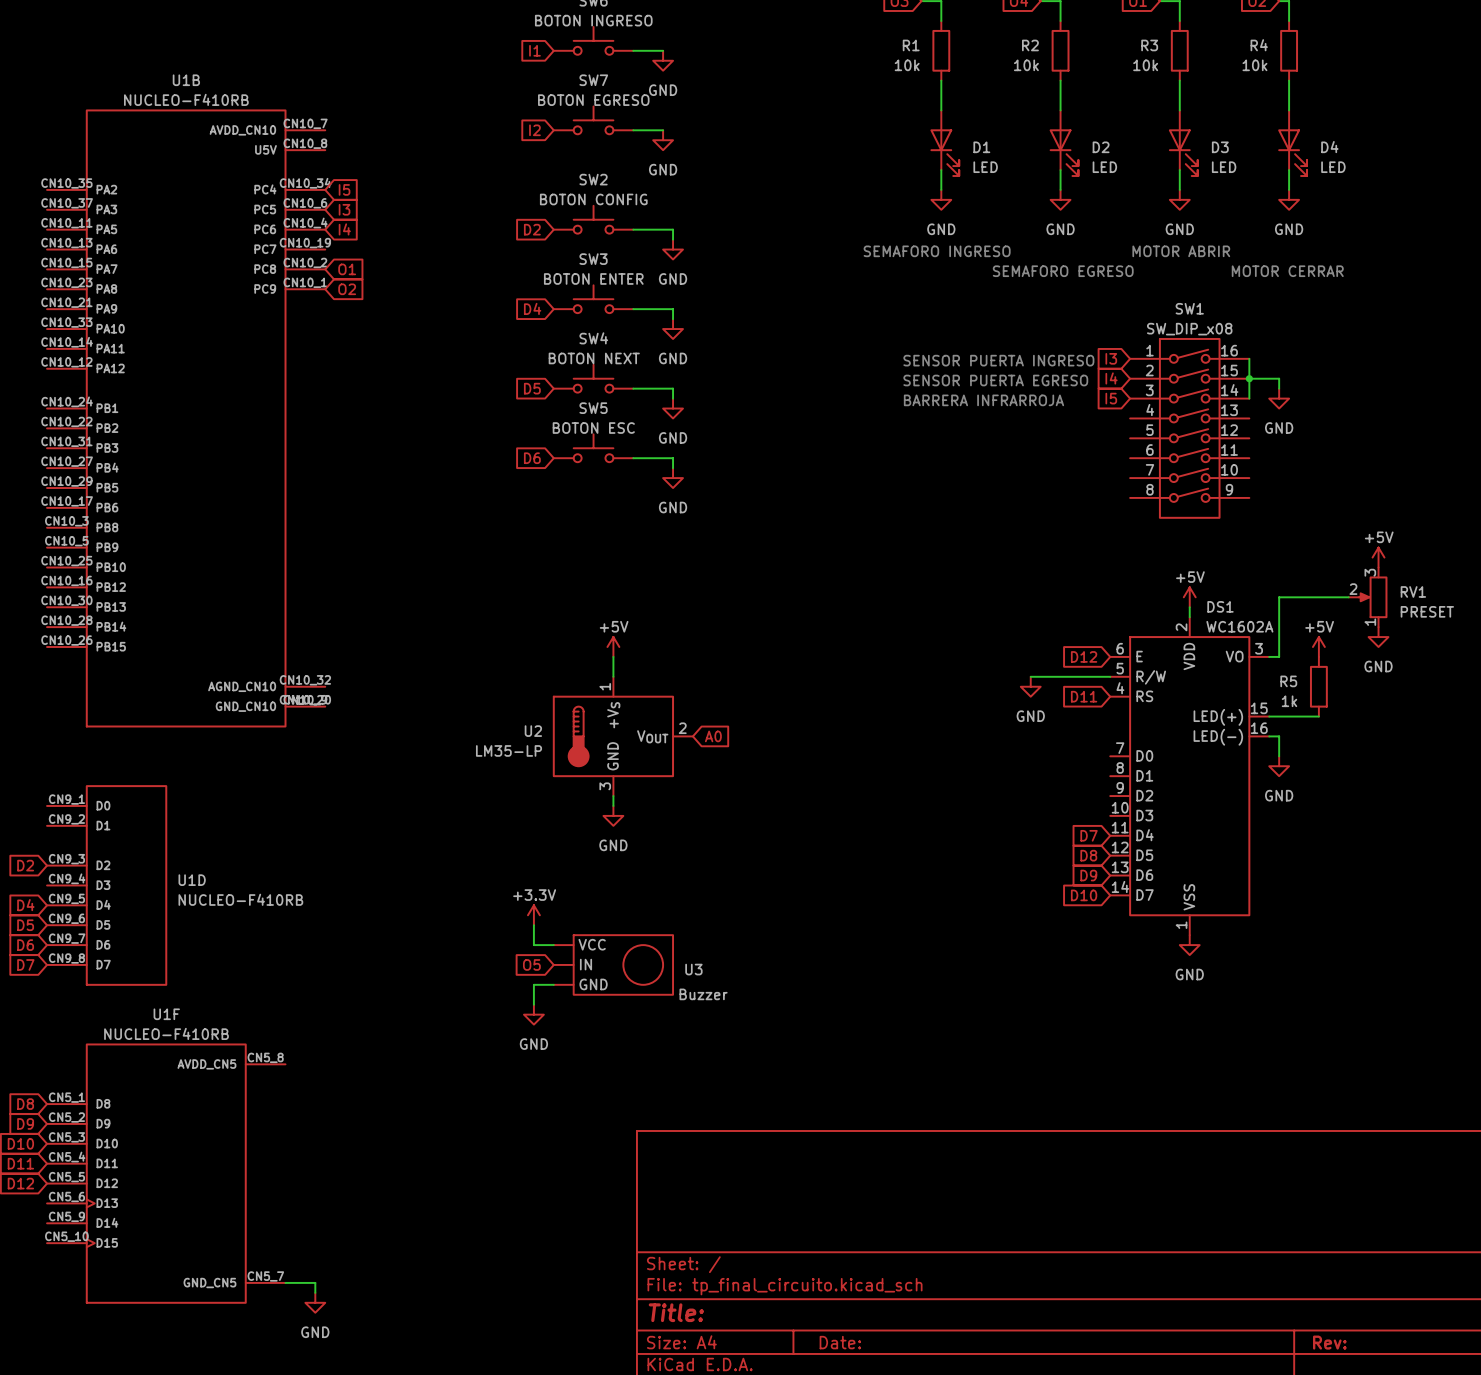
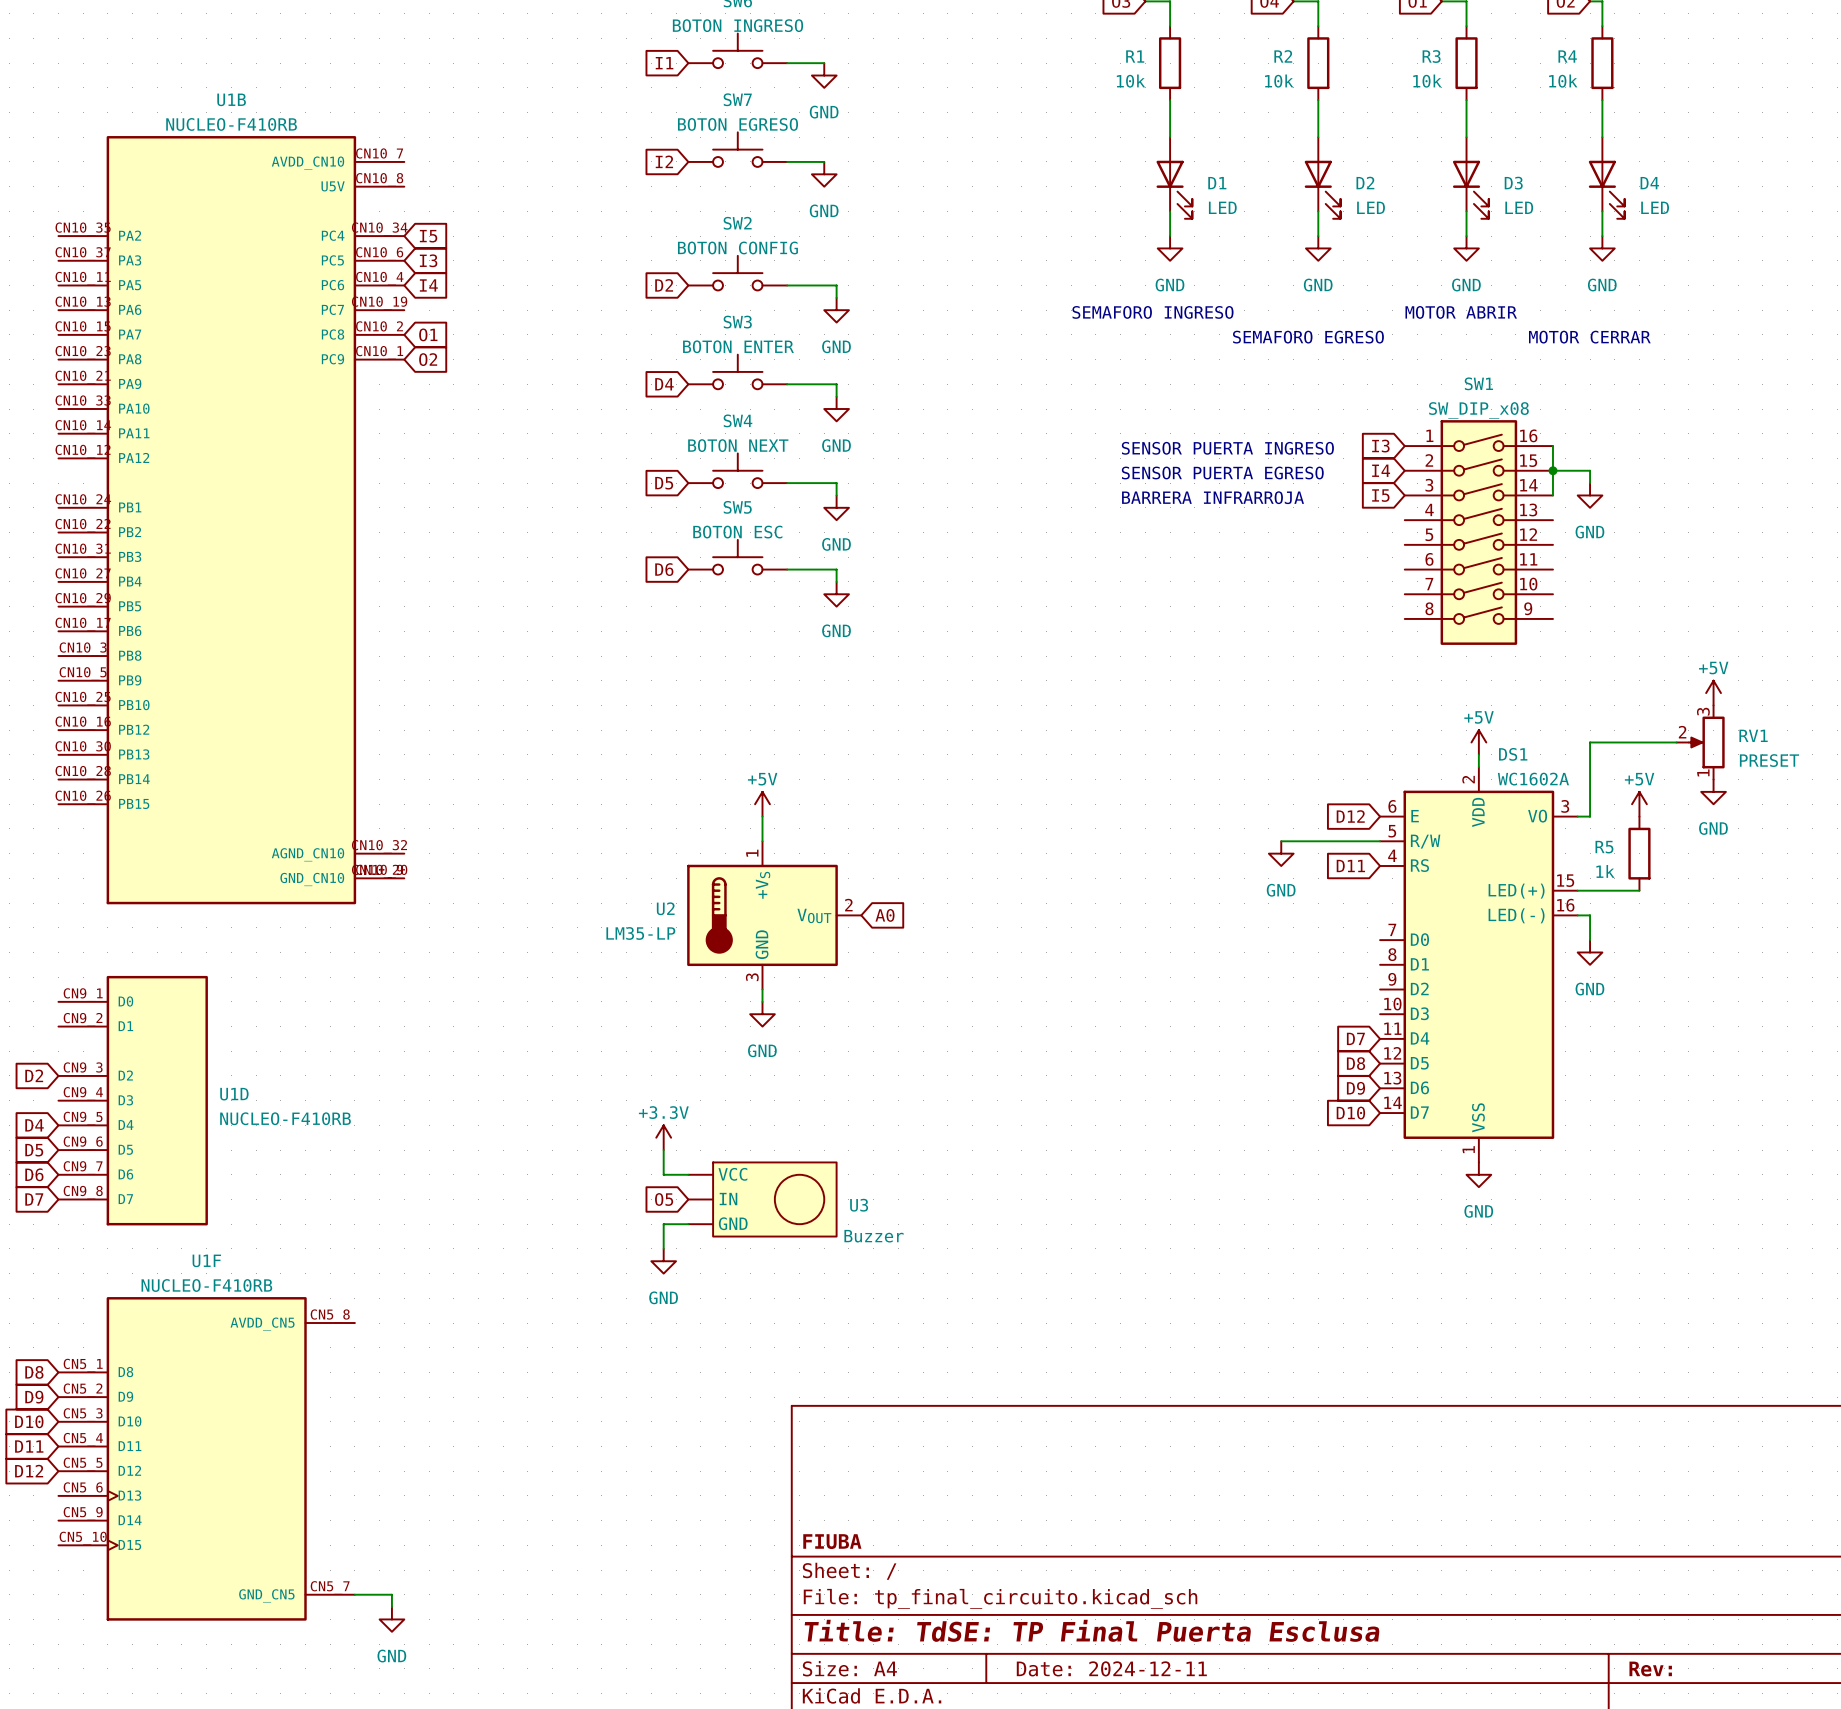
title block: none -> FIUBA (832, 1541)
title block: Title: (676, 1312) -> Title: TdSE: TP Final Puerta Esclusa (1092, 1630)
title block: Date: (840, 1342) -> Date: 2024-12-11 (1111, 1668)

